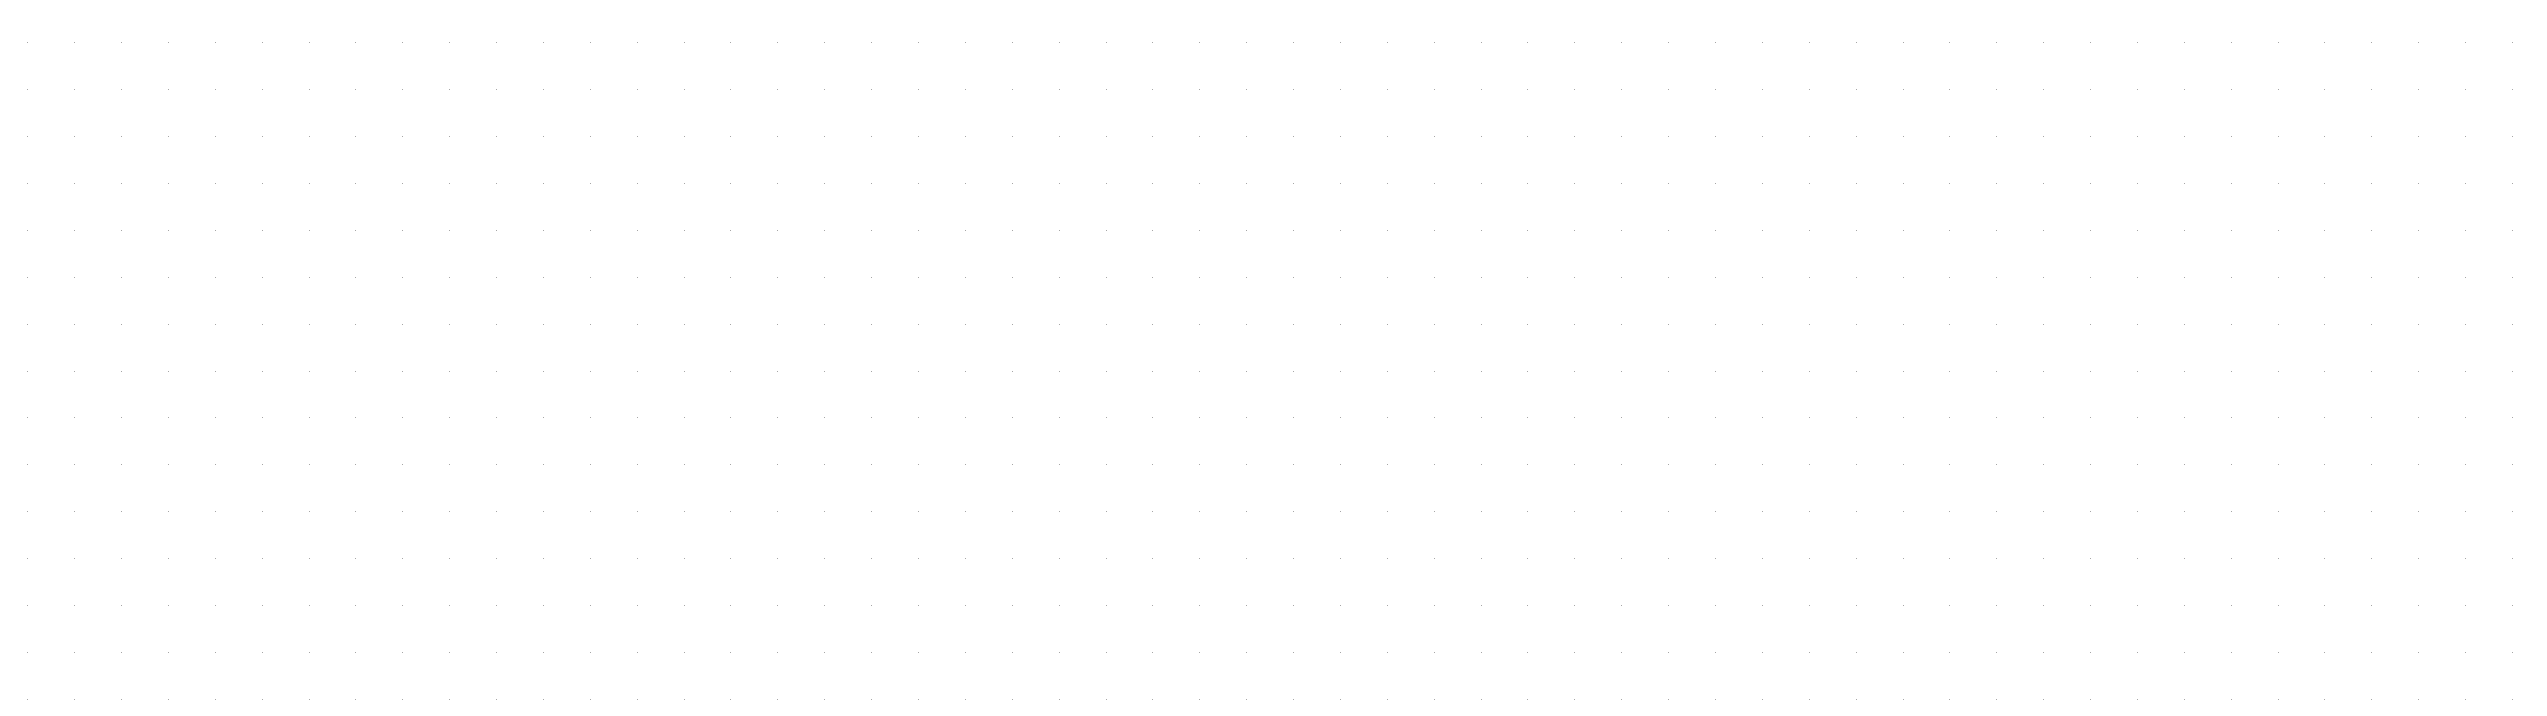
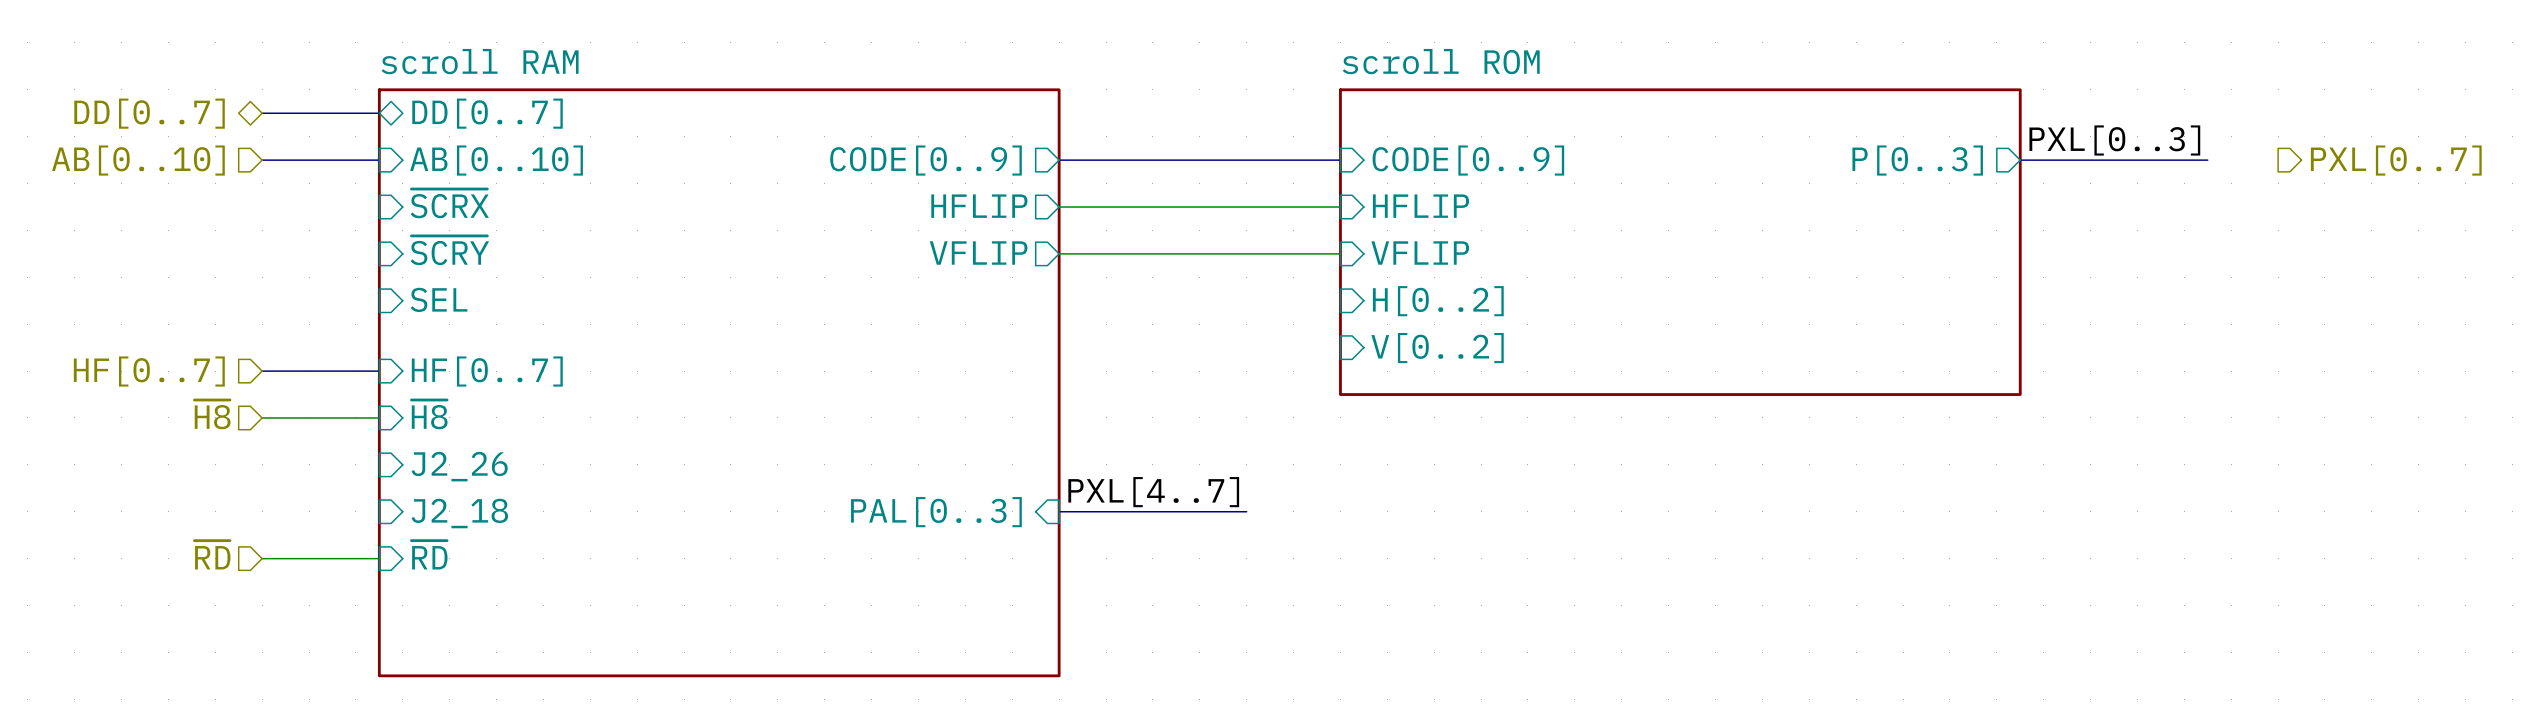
hierarchical label: none -> DD[0..7] (149, 113)
bus: none -> (262, 113) (379, 113)
sheet pin: none -> DD[0..7] (487, 113)
label: none -> PXL[0..3] (2114, 140)
hierarchical label: none -> AB[0..10] (138, 160)
bus: none -> (262, 160) (379, 160)
sheet pin: none -> AB[0..10] (496, 160)
sheet pin: none -> CODE[0..9] (926, 160)
bus: none -> (1059, 160) (1340, 160)
sheet pin: none -> CODE[0..9] (1468, 160)
sheet pin: none -> P[0..3] (1917, 160)
bus: none -> (2020, 160) (2207, 160)
hierarchical label: none -> PXL[0..7] (2396, 160)
sheet pin: none -> ~{SCRX} (449, 203)
sheet pin: none -> HFLIP (979, 206)
sheet pin: none -> HFLIP (1420, 206)
wire: none -> (1059, 207) (1340, 207)
sheet scroll ROM: none -> (1680, 242)
sheet pin: none -> ~{SCRY} (449, 250)
sheet pin: none -> VFLIP (978, 253)
wire: none -> (1059, 253) (1340, 253)
sheet pin: none -> VFLIP (1420, 253)
sheet pin: none -> SEL (439, 299)
sheet pin: none -> H[0..2] (1438, 301)
sheet pin: none -> V[0..2] (1437, 348)
hierarchical label: none -> HF[0..7] (149, 371)
bus: none -> (262, 371) (379, 371)
sheet pin: none -> HF[0..7] (487, 371)
sheet scroll RAM: none -> (719, 382)
hierarchical label: none -> ~{H8} (212, 414)
sheet pin: none -> ~{H8} (429, 414)
wire: none -> (262, 417) (379, 417)
sheet pin: none -> J2_26 (459, 466)
label: none -> PXL[4..7] (1153, 492)
bus: none -> (1059, 511) (1246, 511)
sheet pin: none -> PAL[0..3] (936, 512)
sheet pin: none -> J2_18 (459, 513)
hierarchical label: none -> ~{RD} (212, 555)
sheet pin: none -> ~{RD} (429, 555)
wire: none -> (262, 558) (379, 558)

